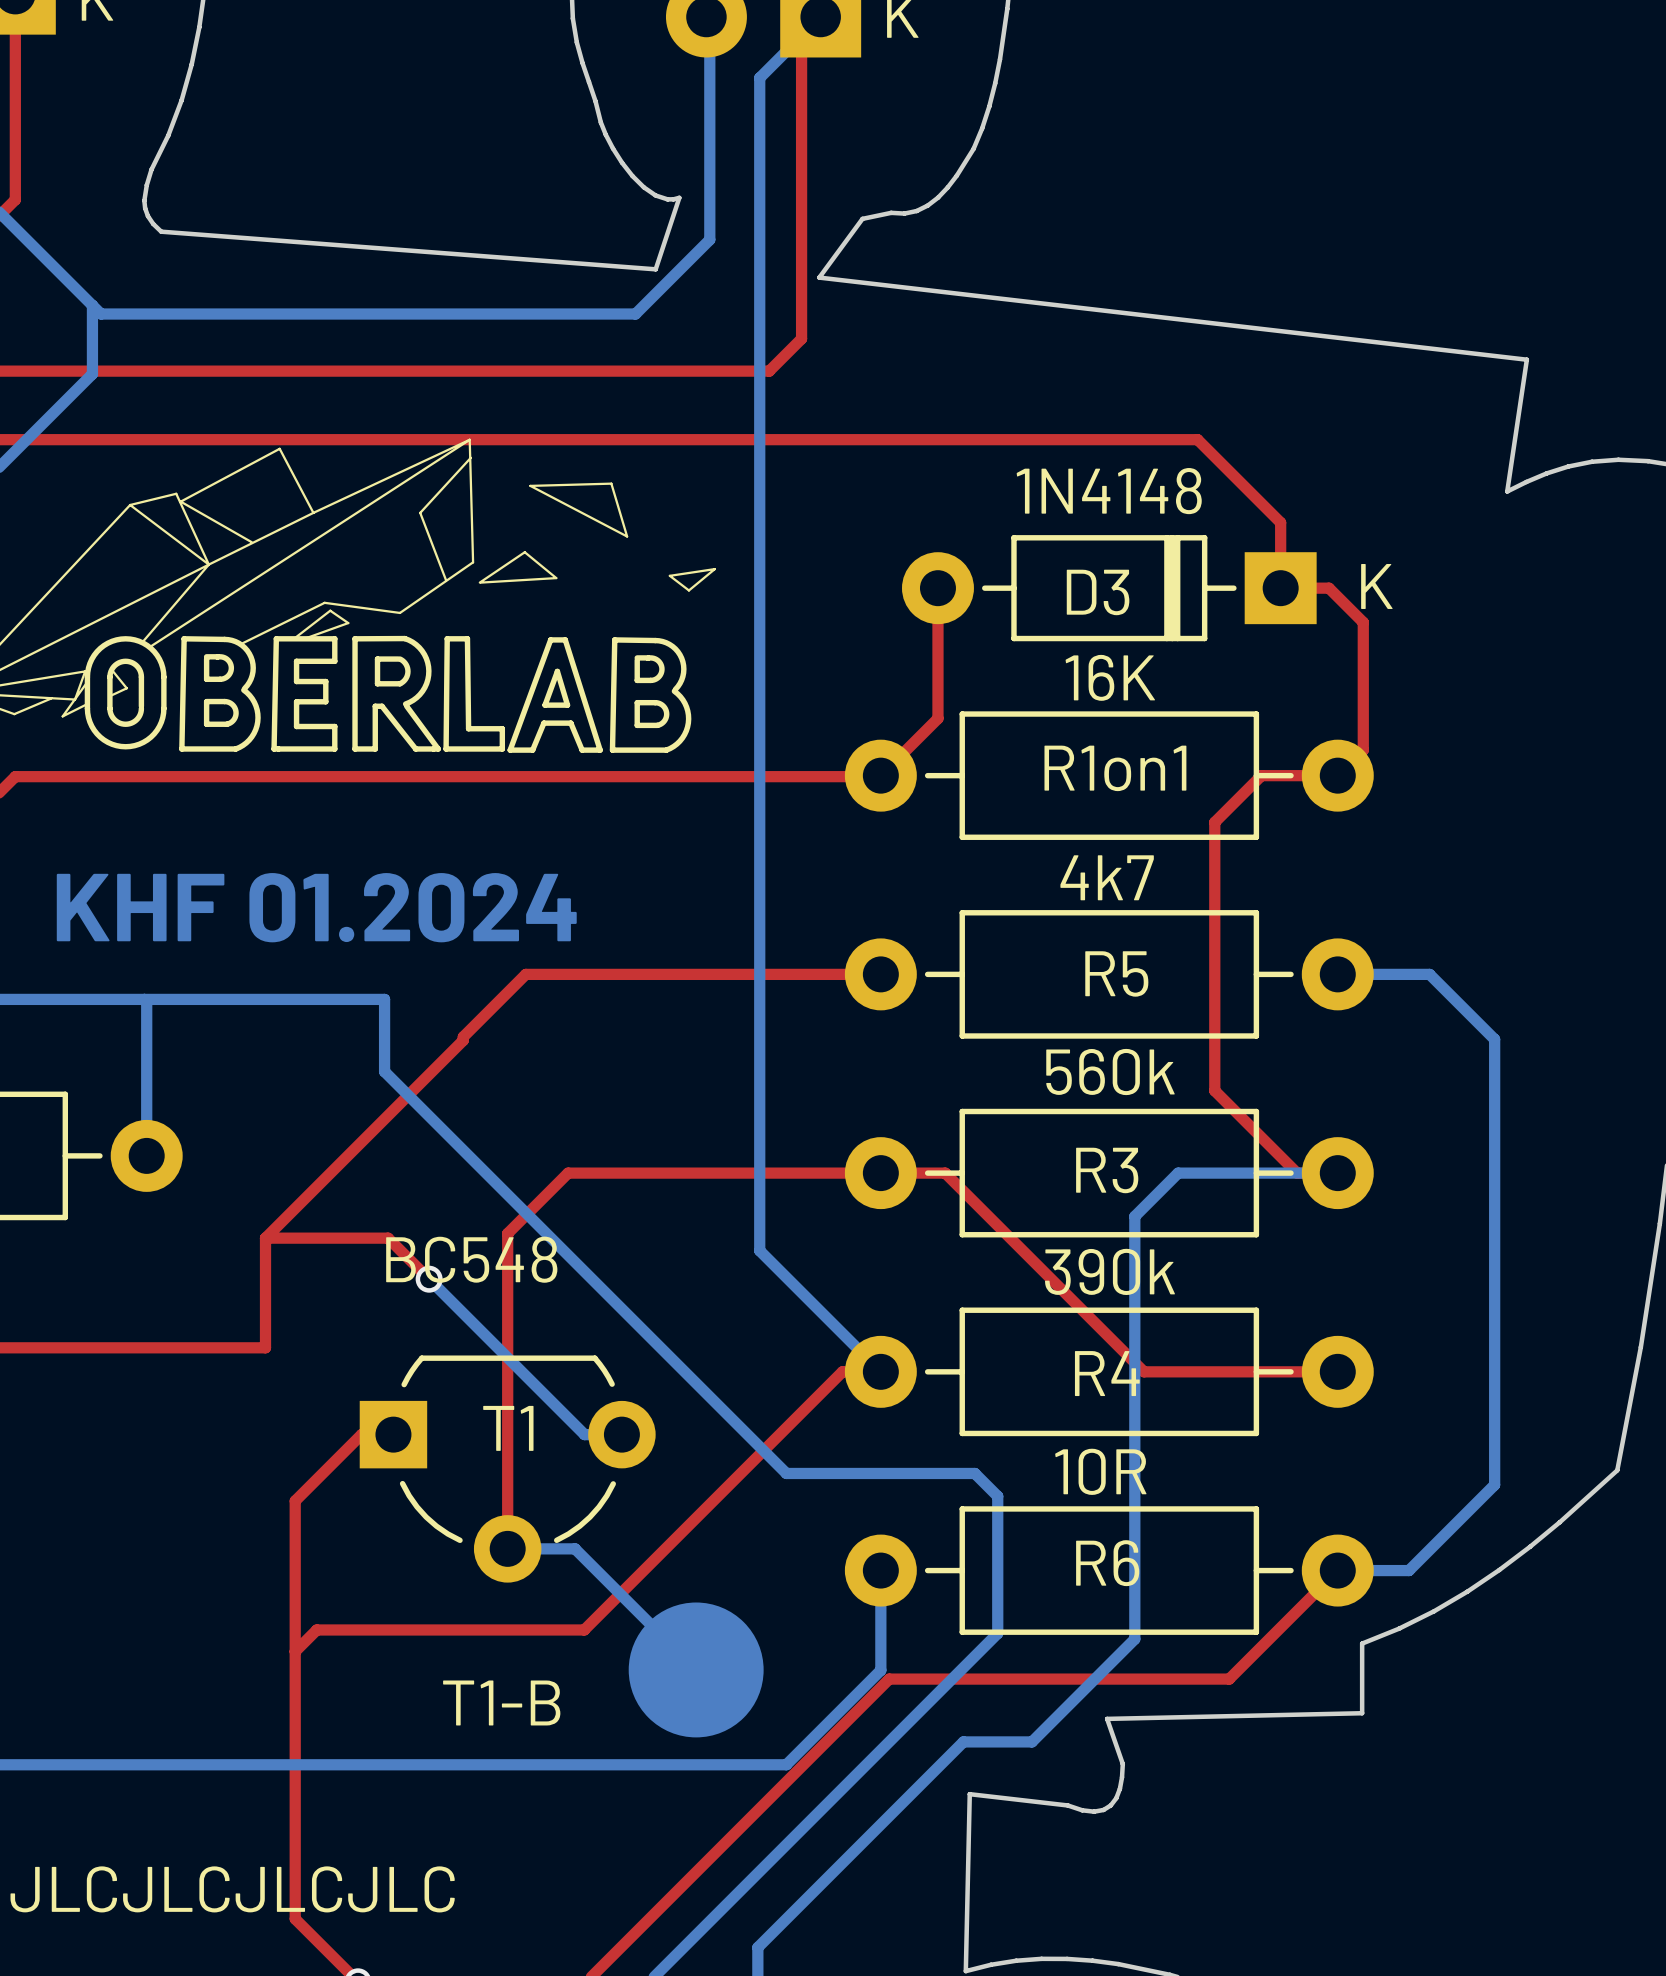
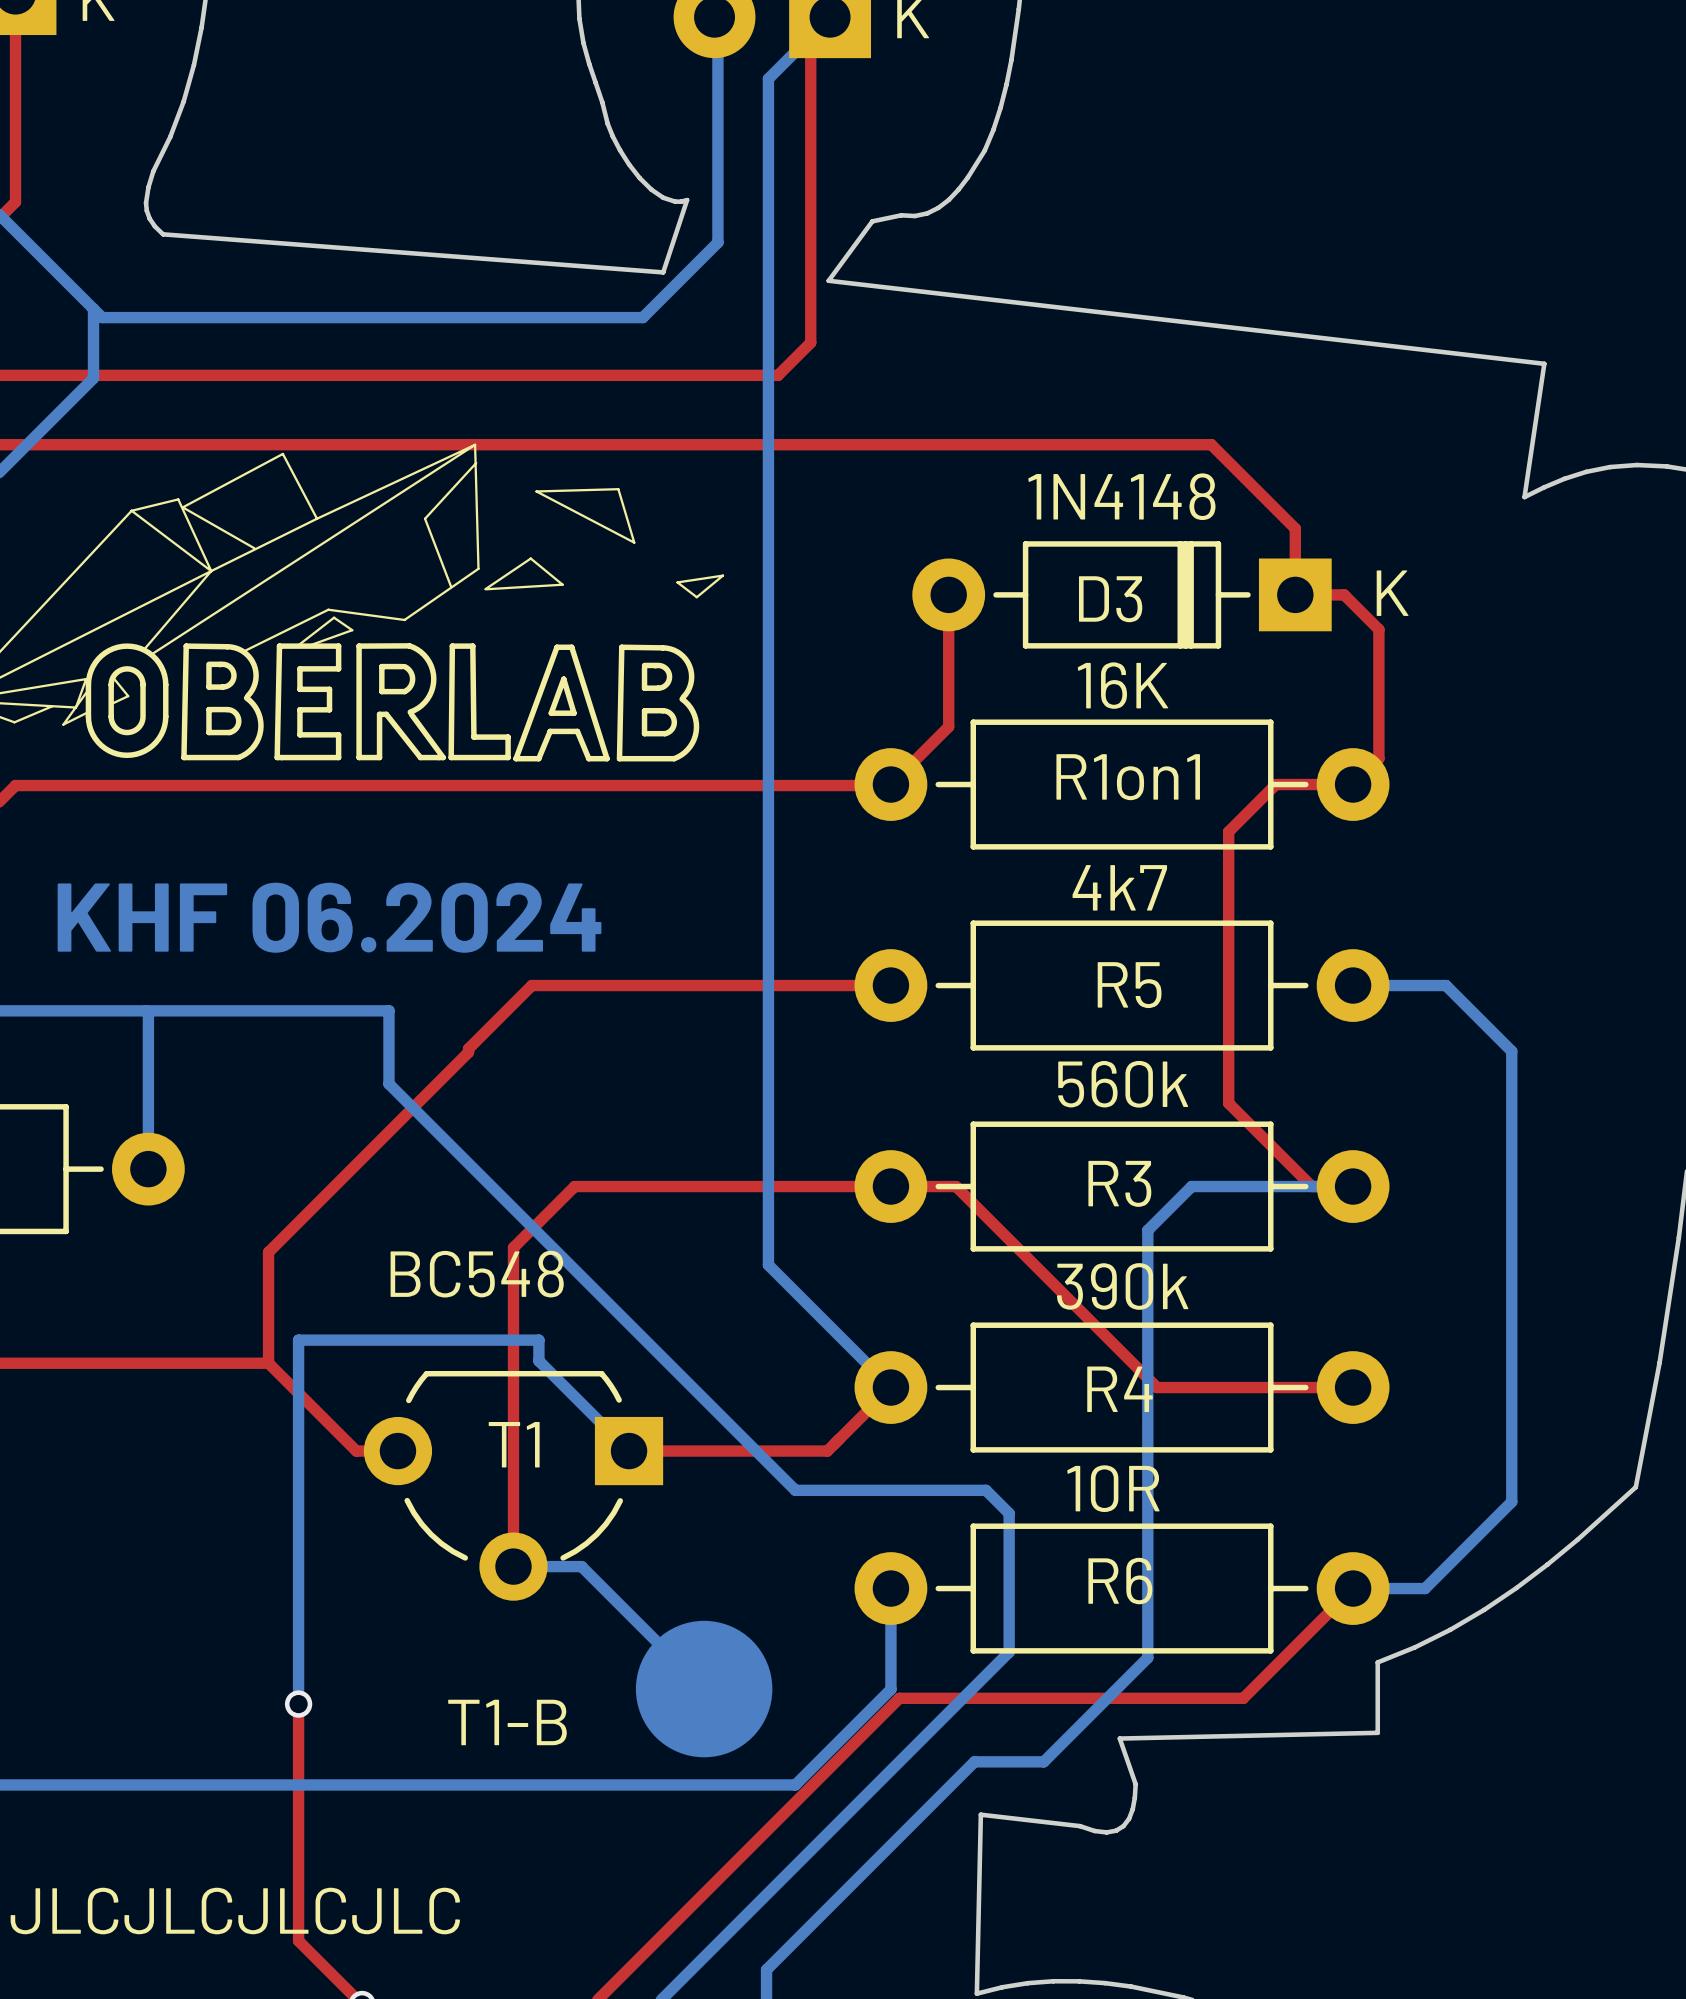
text: KHF 01.2024 (316, 907) -> KHF 06.2024 (329, 917)
top track: (265, 1238) (388, 1238) (429, 1279) -> none
bottom track: (429, 1279) (584, 1434) (621, 1434) -> (298, 1704) (298, 1340) (538, 1340) (538, 1360) (629, 1451)
via: (429, 1279) -> none
T1 footprint: [359, 1355, 656, 1583] -> [363, 1370, 664, 1601]
top track: (880, 1371) (842, 1371) (584, 1629) (316, 1629) (295, 1651) -> (890, 1387) (827, 1451) (629, 1451)
top track: (361, 1434) (295, 1500) (295, 1684) -> (365, 1451) (356, 1451) (268, 1363)
via: none -> (298, 1704)

